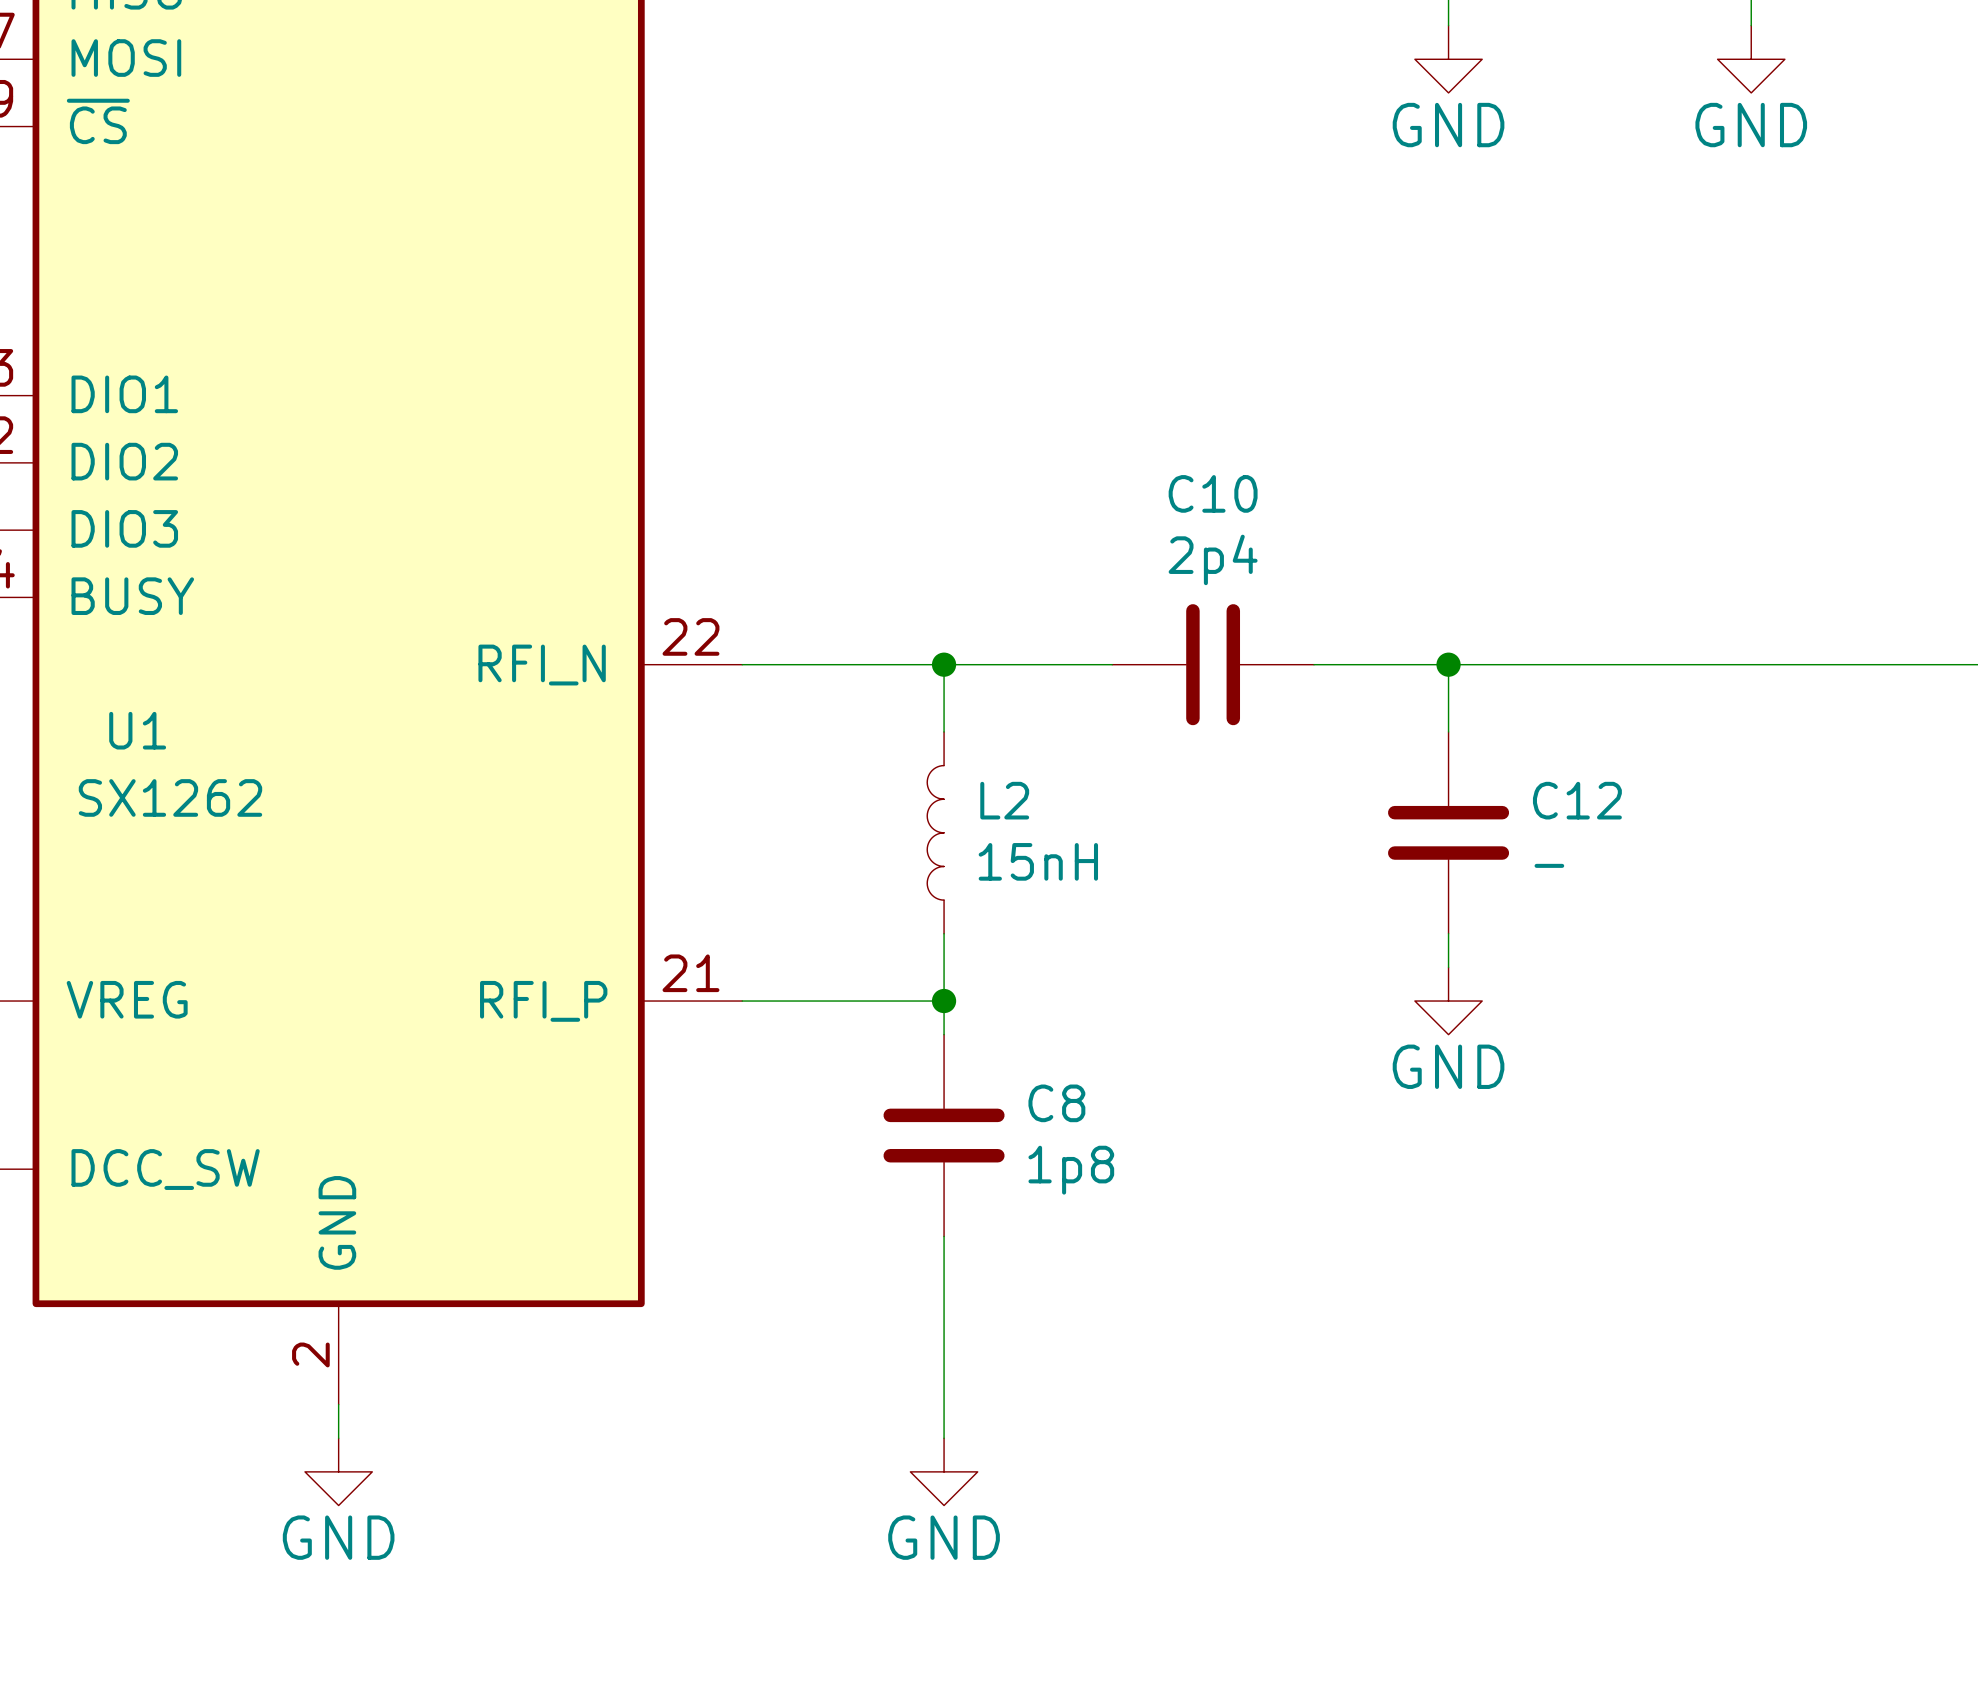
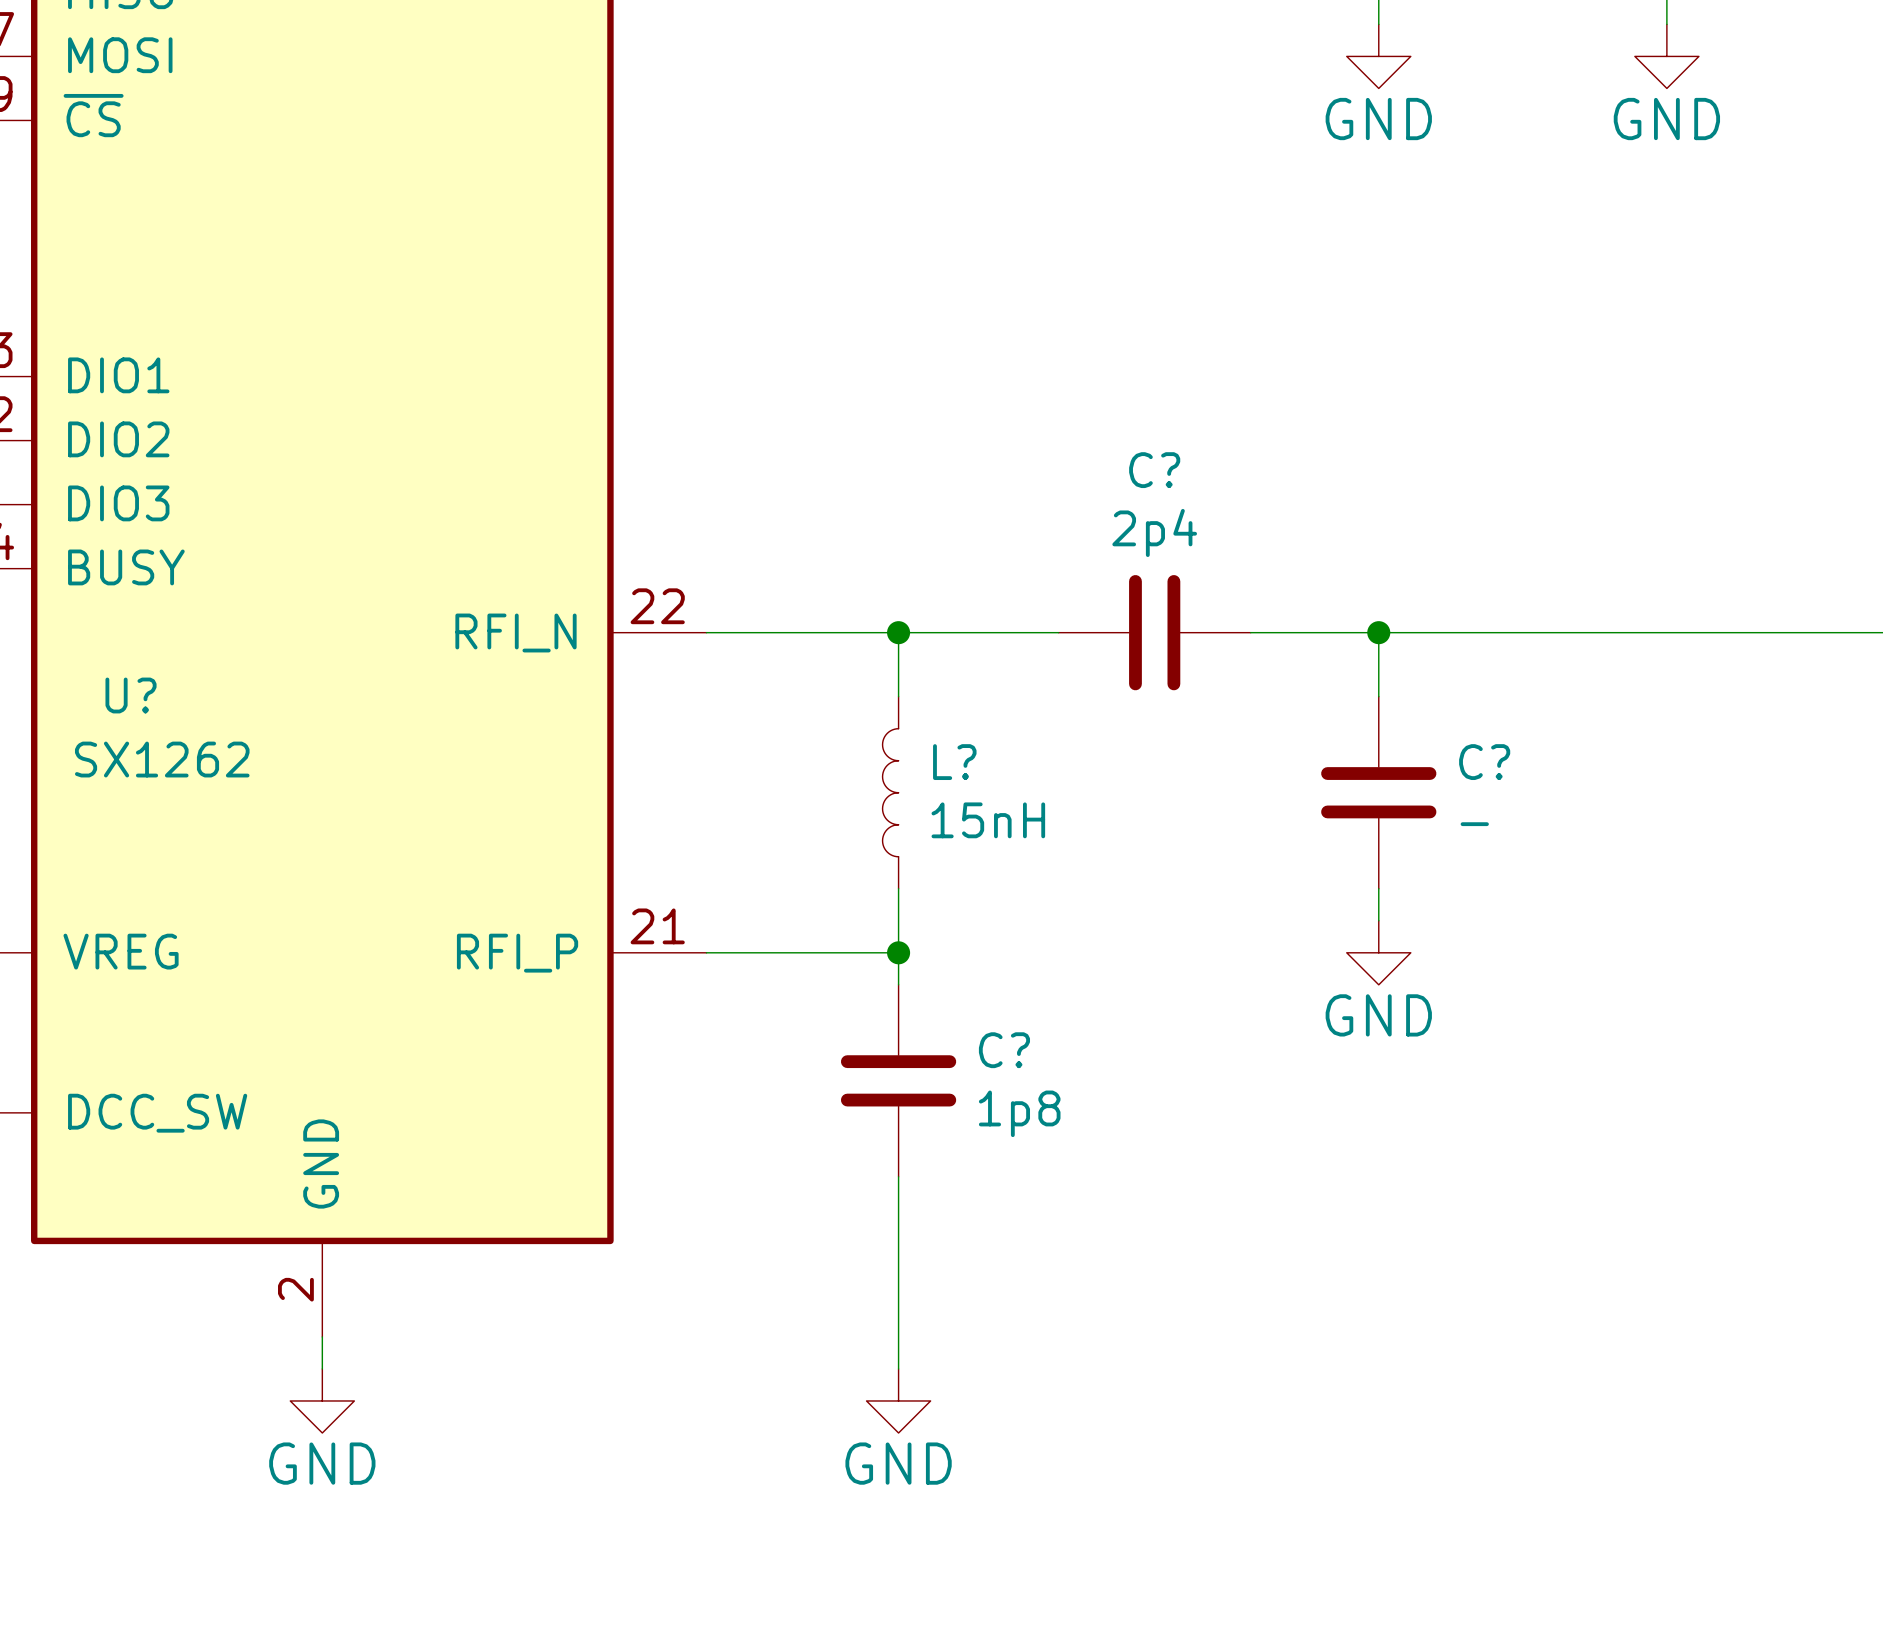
C10 name: C10 (1213, 493) -> C? (1154, 470)
U1 name: U1 (137, 730) -> U? (131, 695)
L2 name: L2 (1004, 800) -> L? (954, 762)
C12 name: C12 (1577, 800) -> C? (1484, 762)
C8 name: C8 (1056, 1103) -> C? (1004, 1050)

